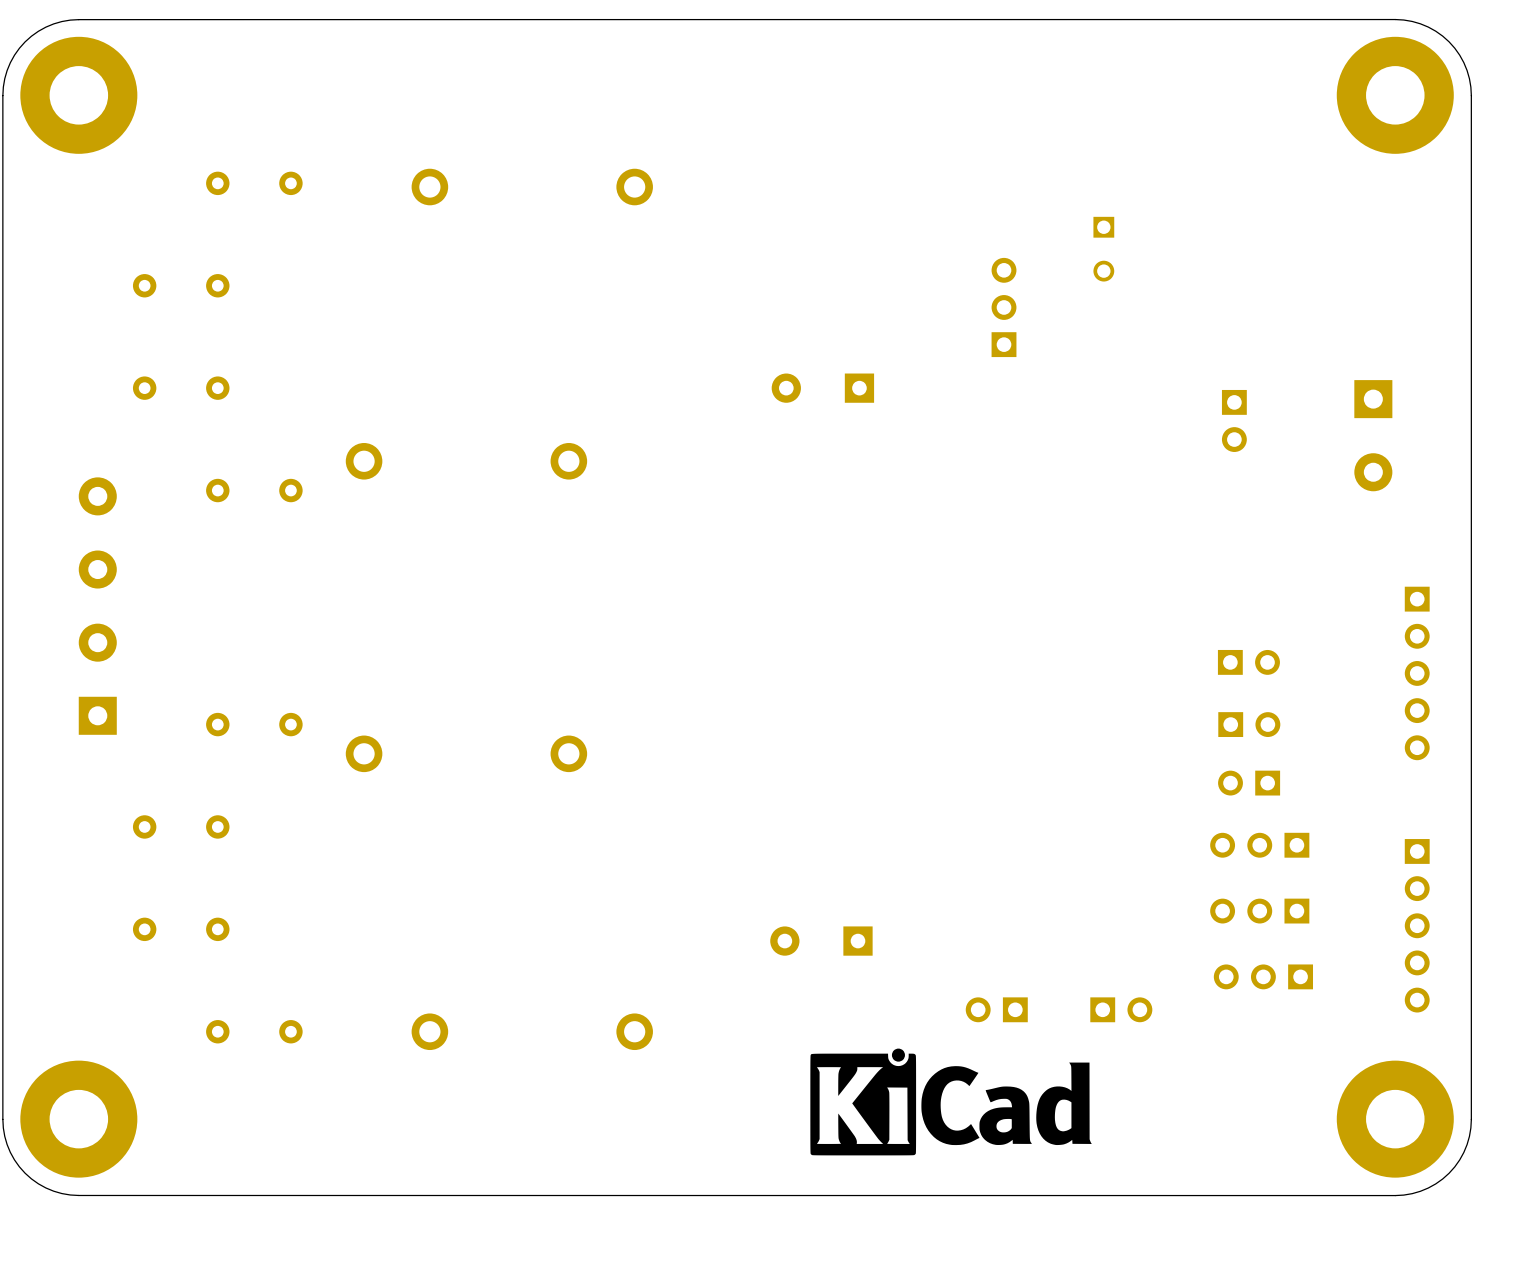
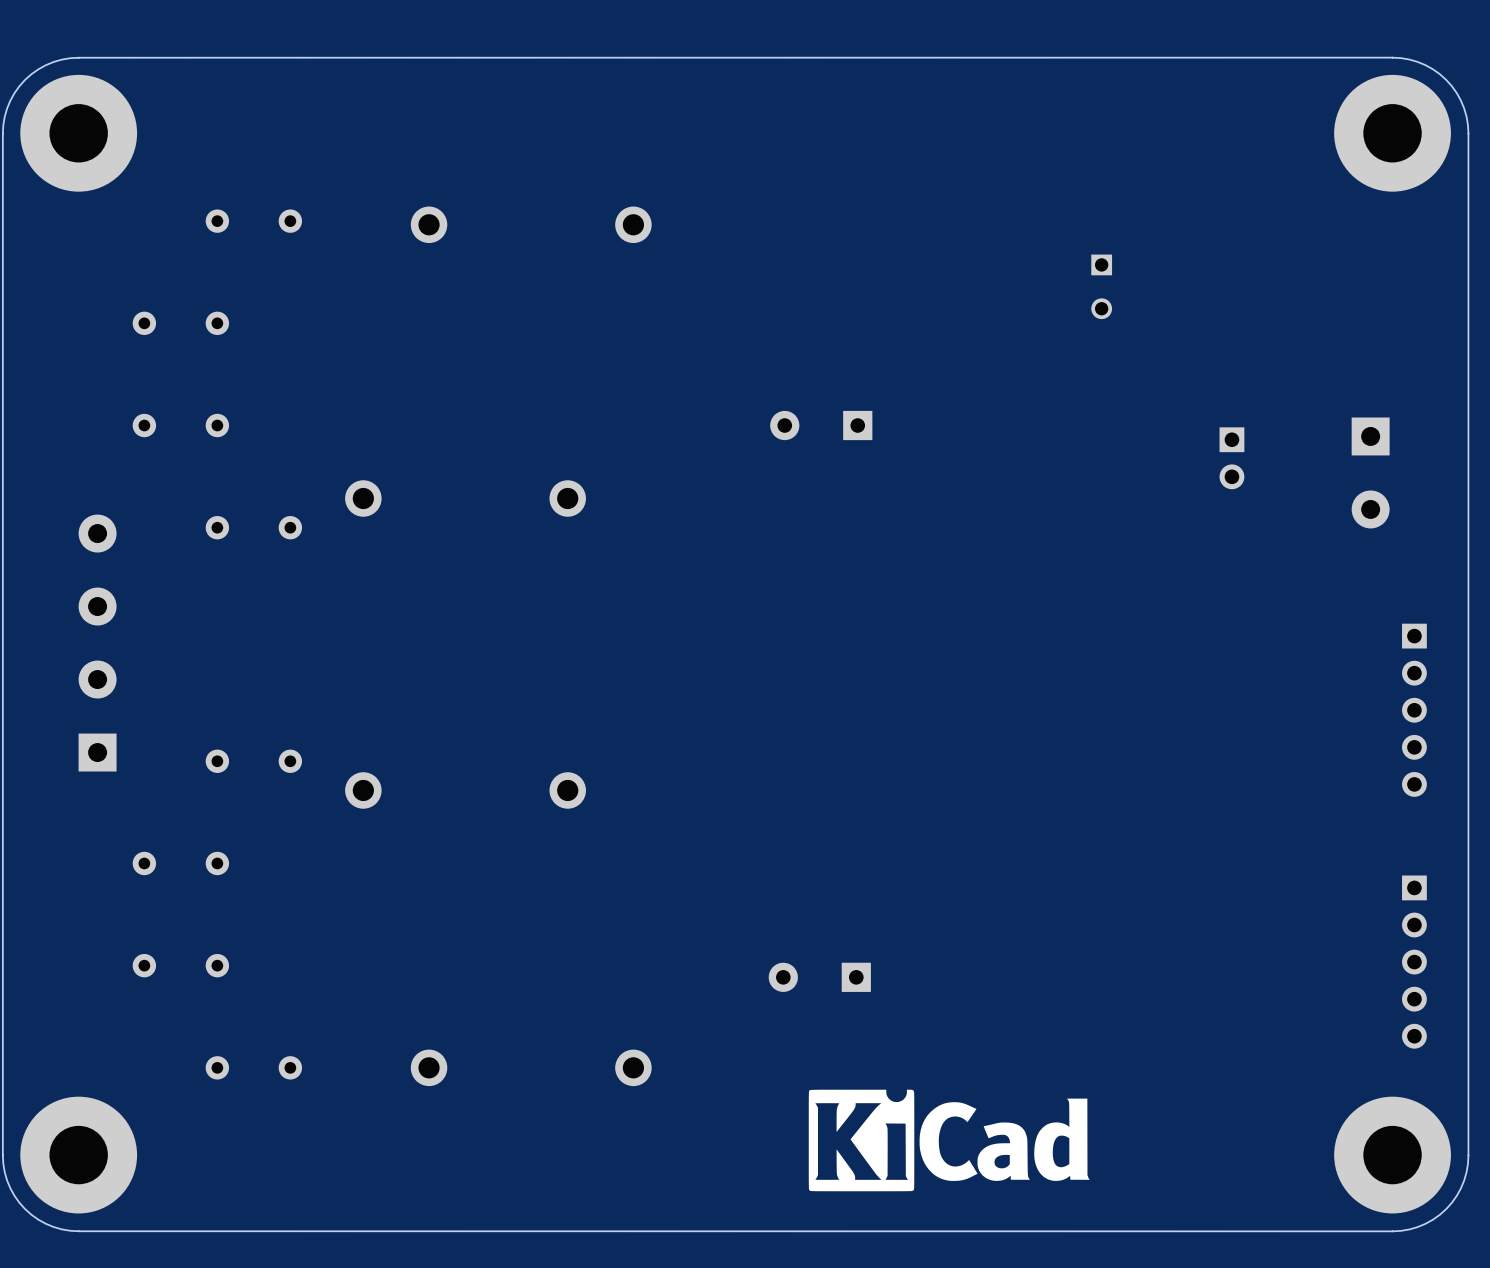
part: (1004, 307) -> none
part: (1248, 662) -> none
part: (1249, 724) -> none
part: (1249, 783) -> none
part: (1259, 845) -> none
part: (1259, 911) -> none
part: (1263, 976) -> none
part: (996, 1009) -> none
part: (1121, 1009) -> none
drawing shape: [810, 1048, 1092, 1156] -> [808, 1089, 1090, 1192]

